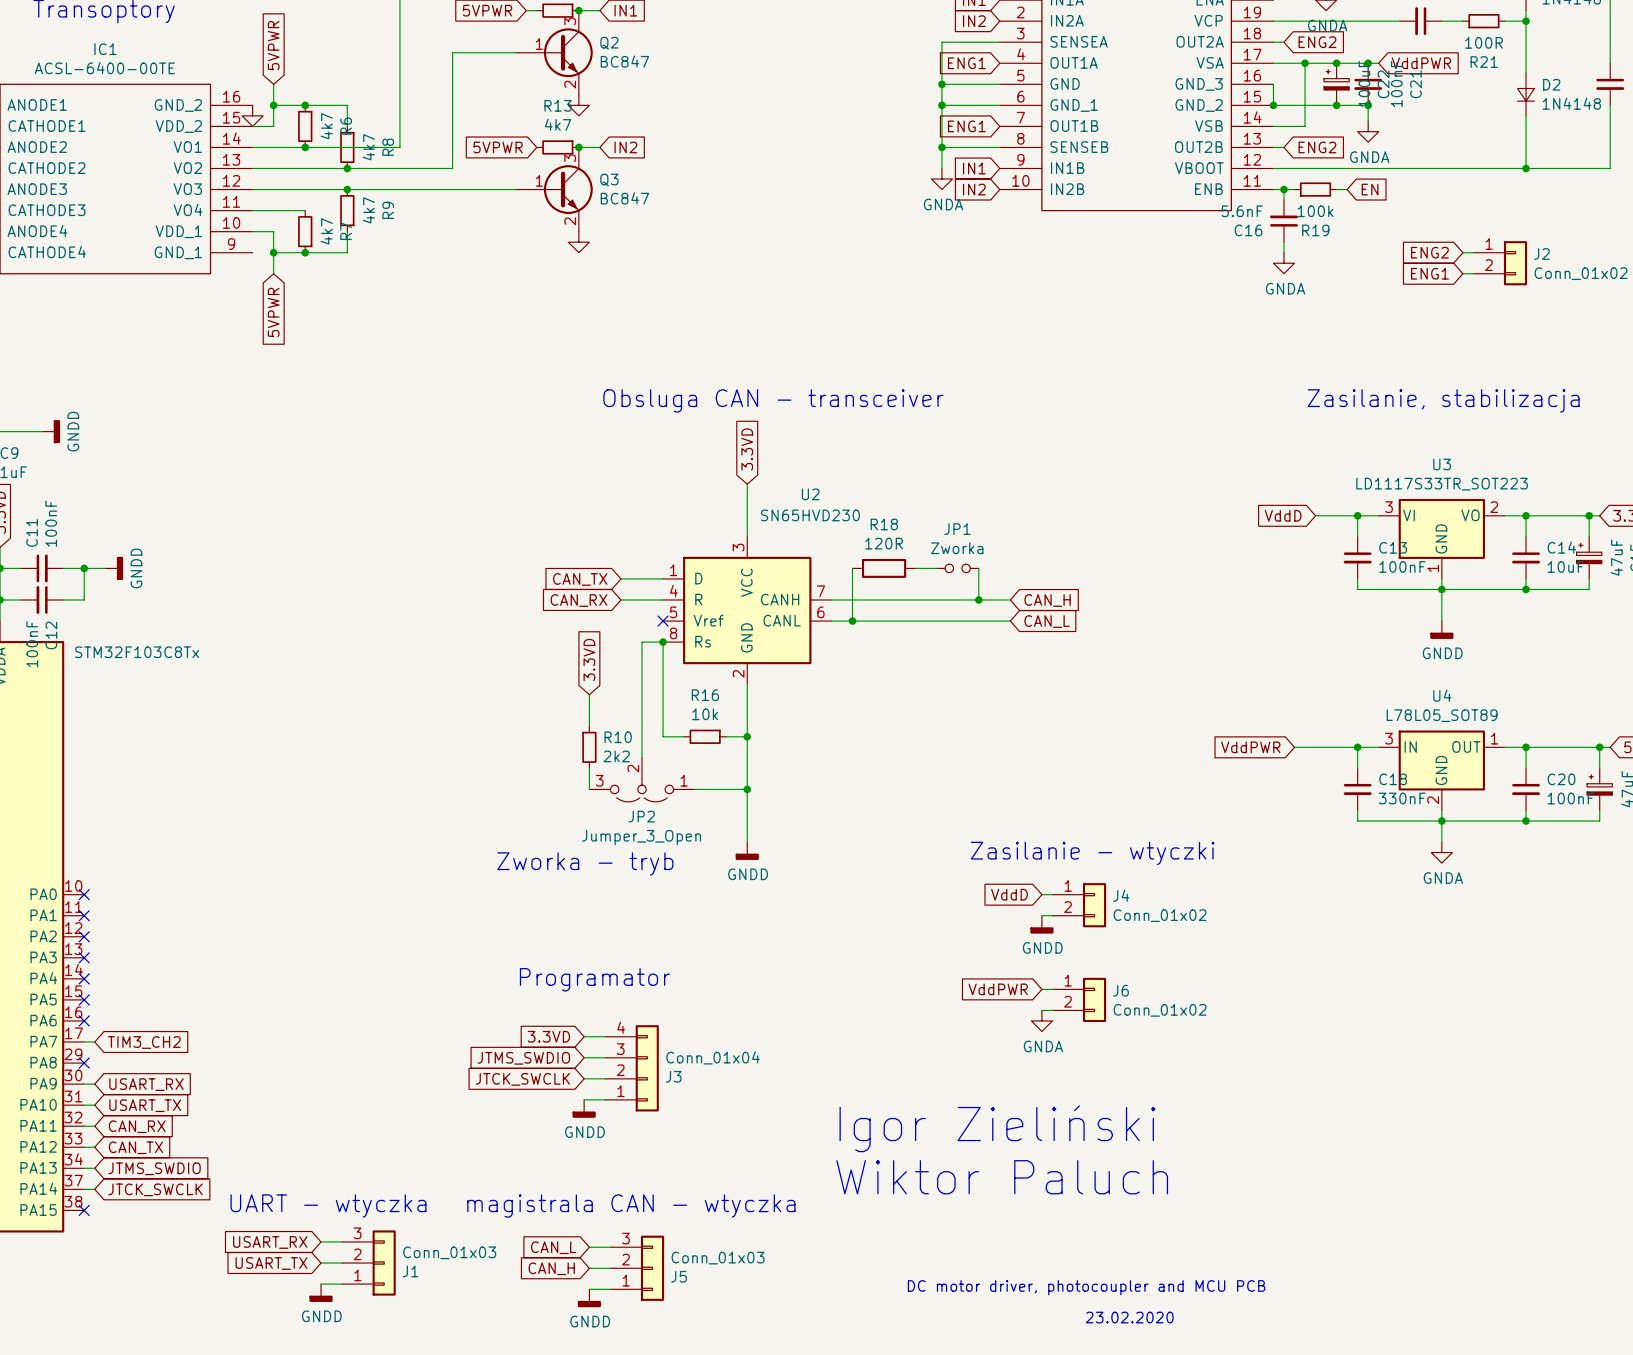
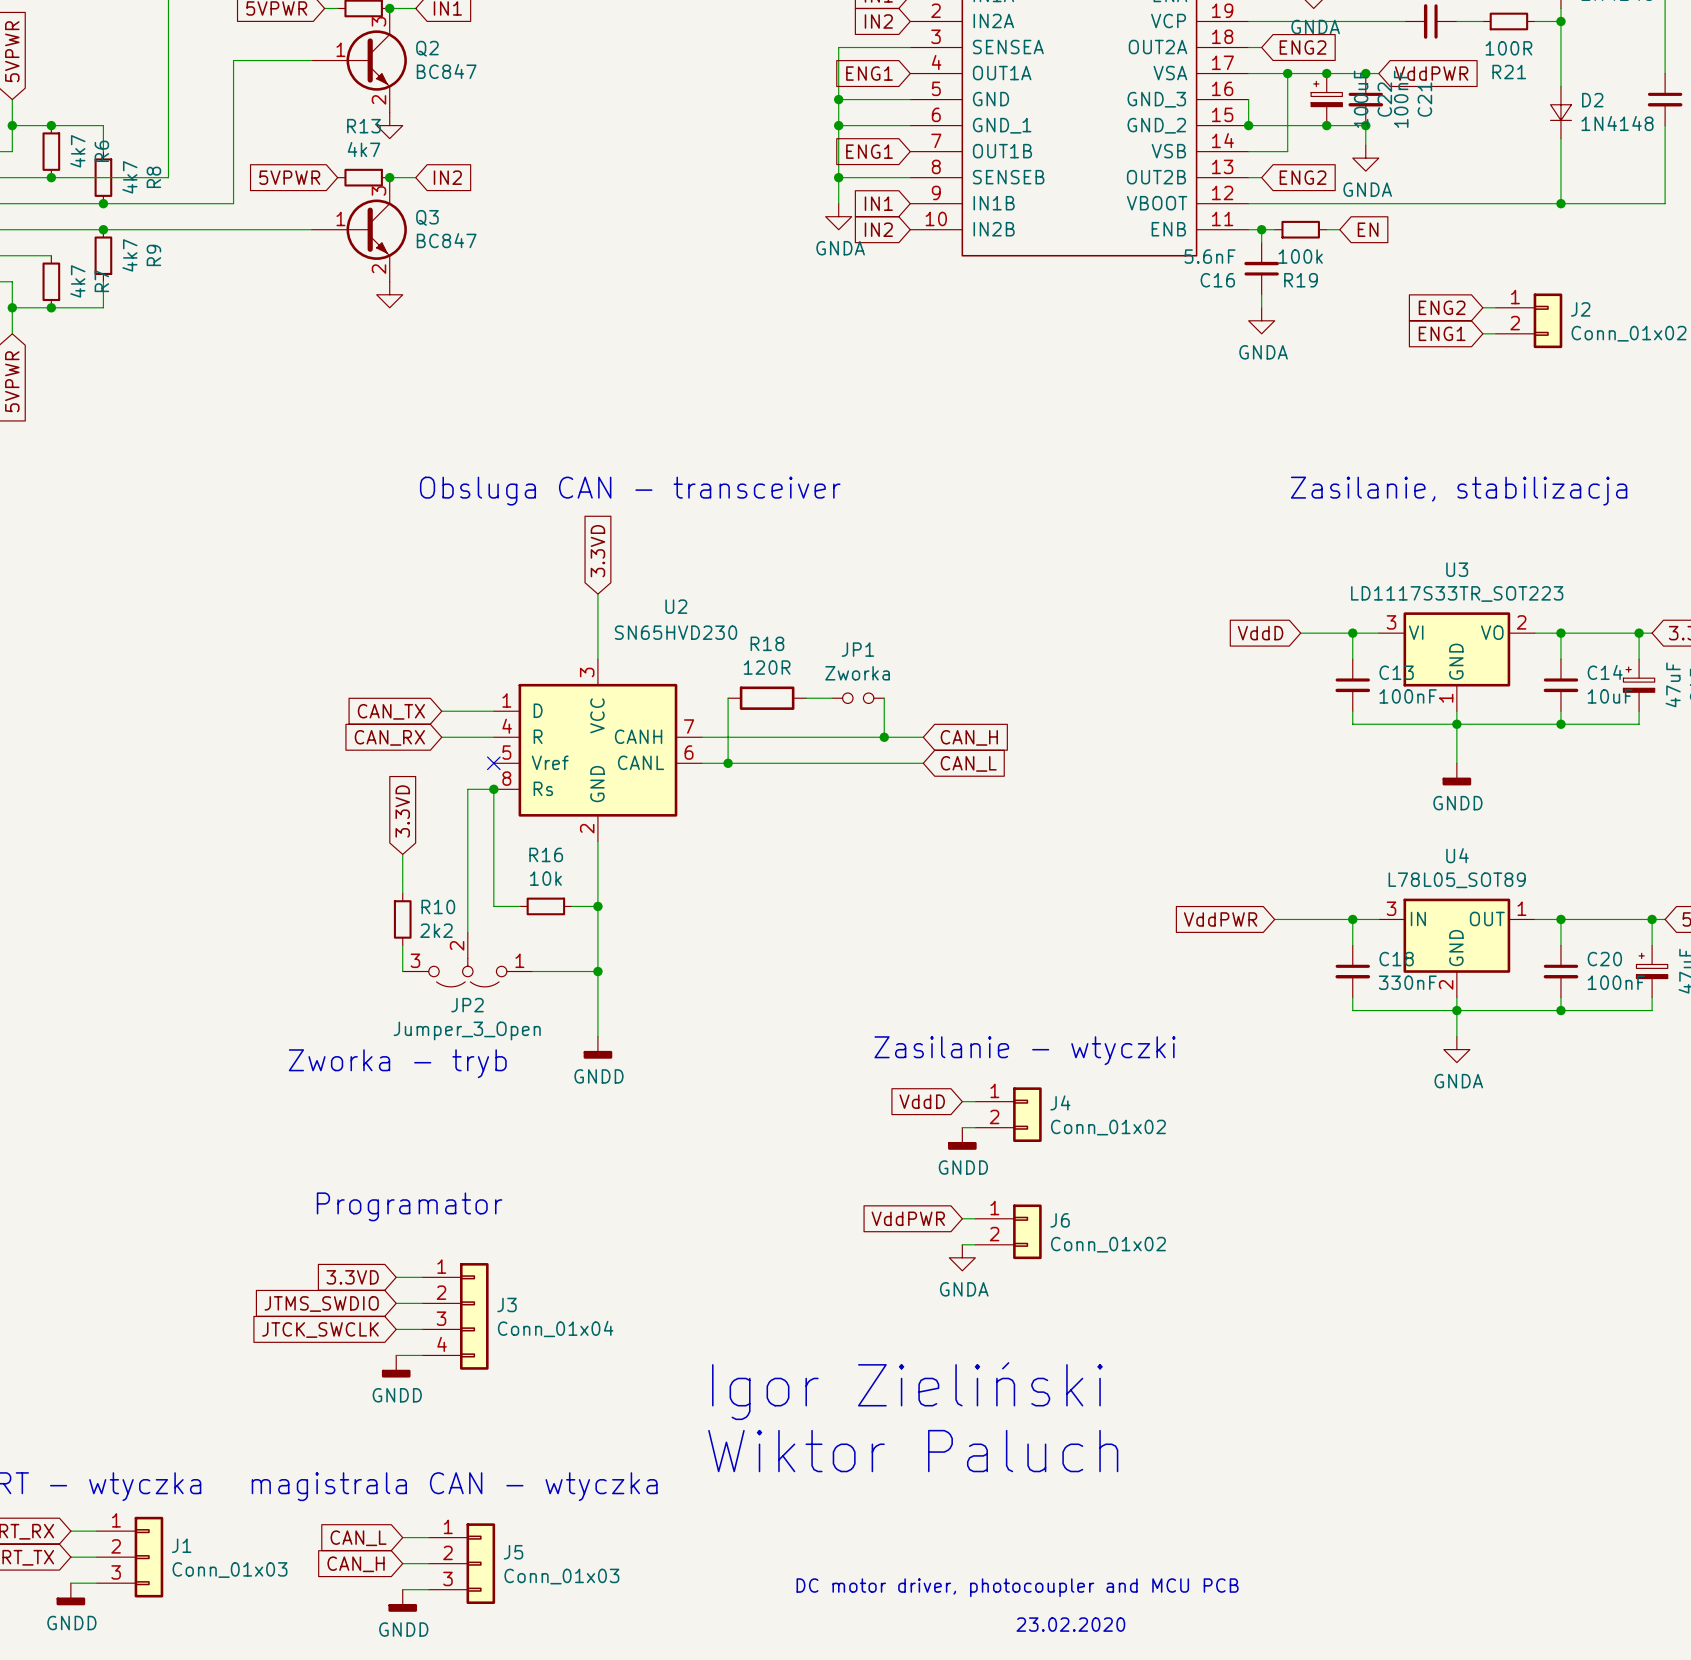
J3 flip: as is (647, 1068) -> up-down (474, 1316)
J1 flip: as is (384, 1263) -> up-down (148, 1557)
J5 flip: as is (652, 1268) -> up-down (480, 1563)

